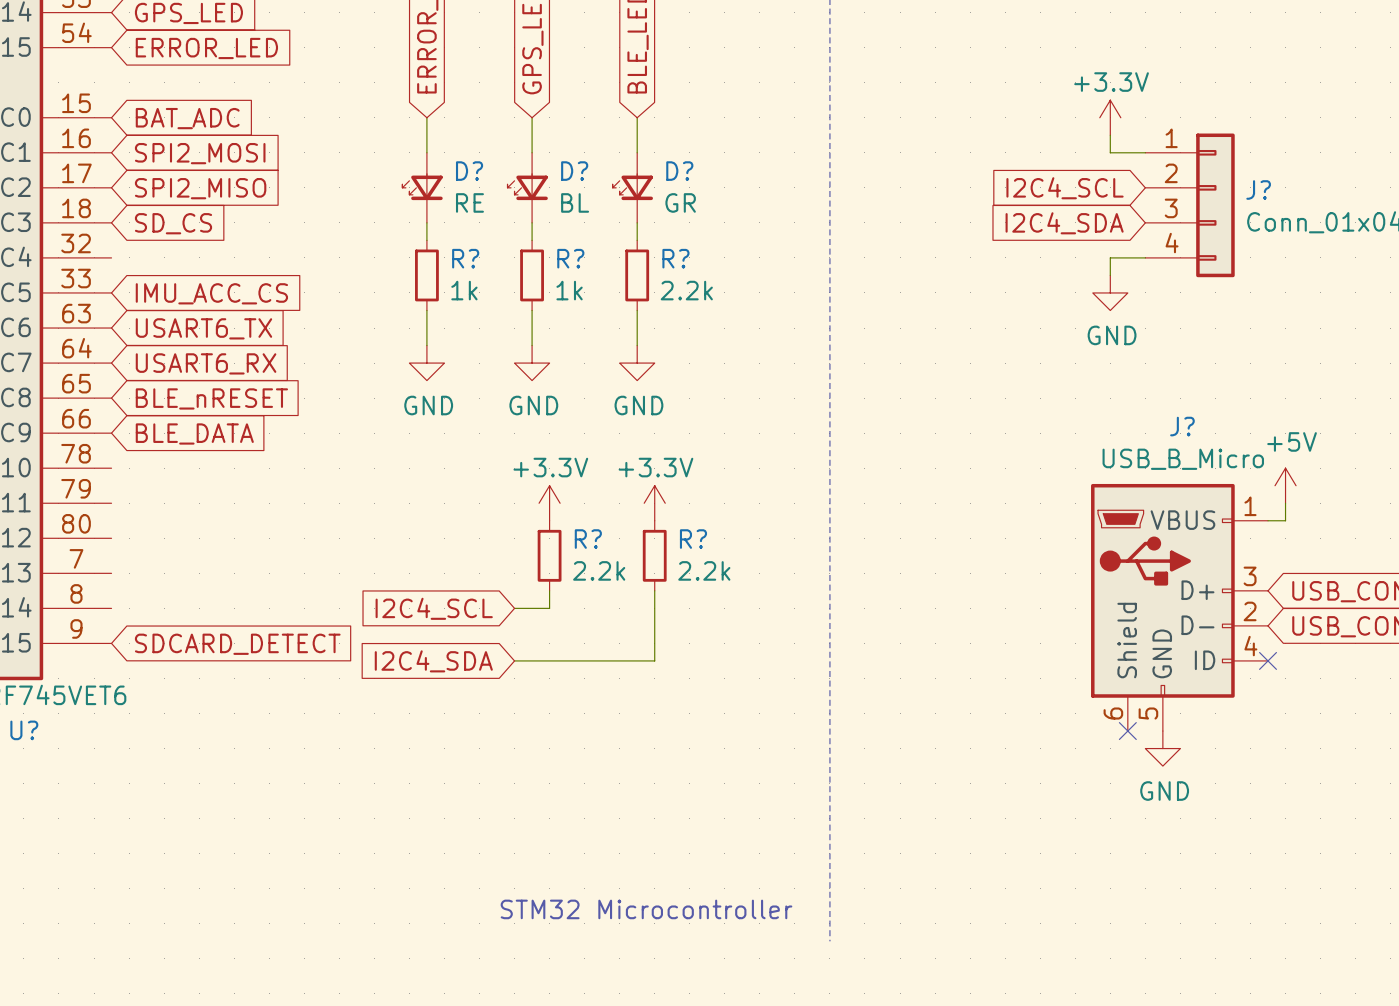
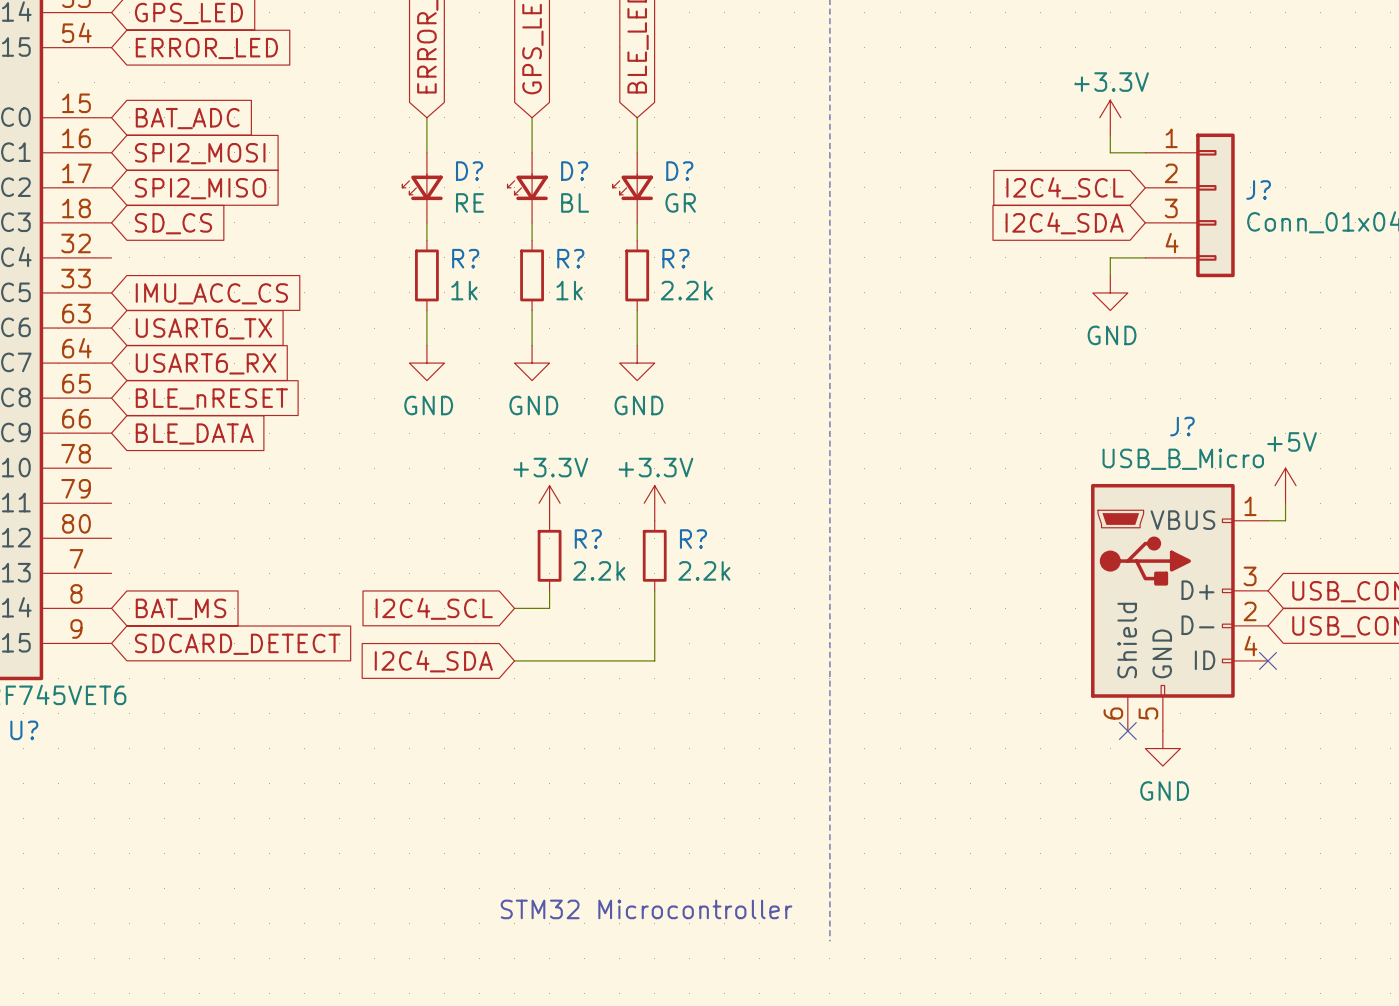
global label: none -> BAT_MS (181, 609)

